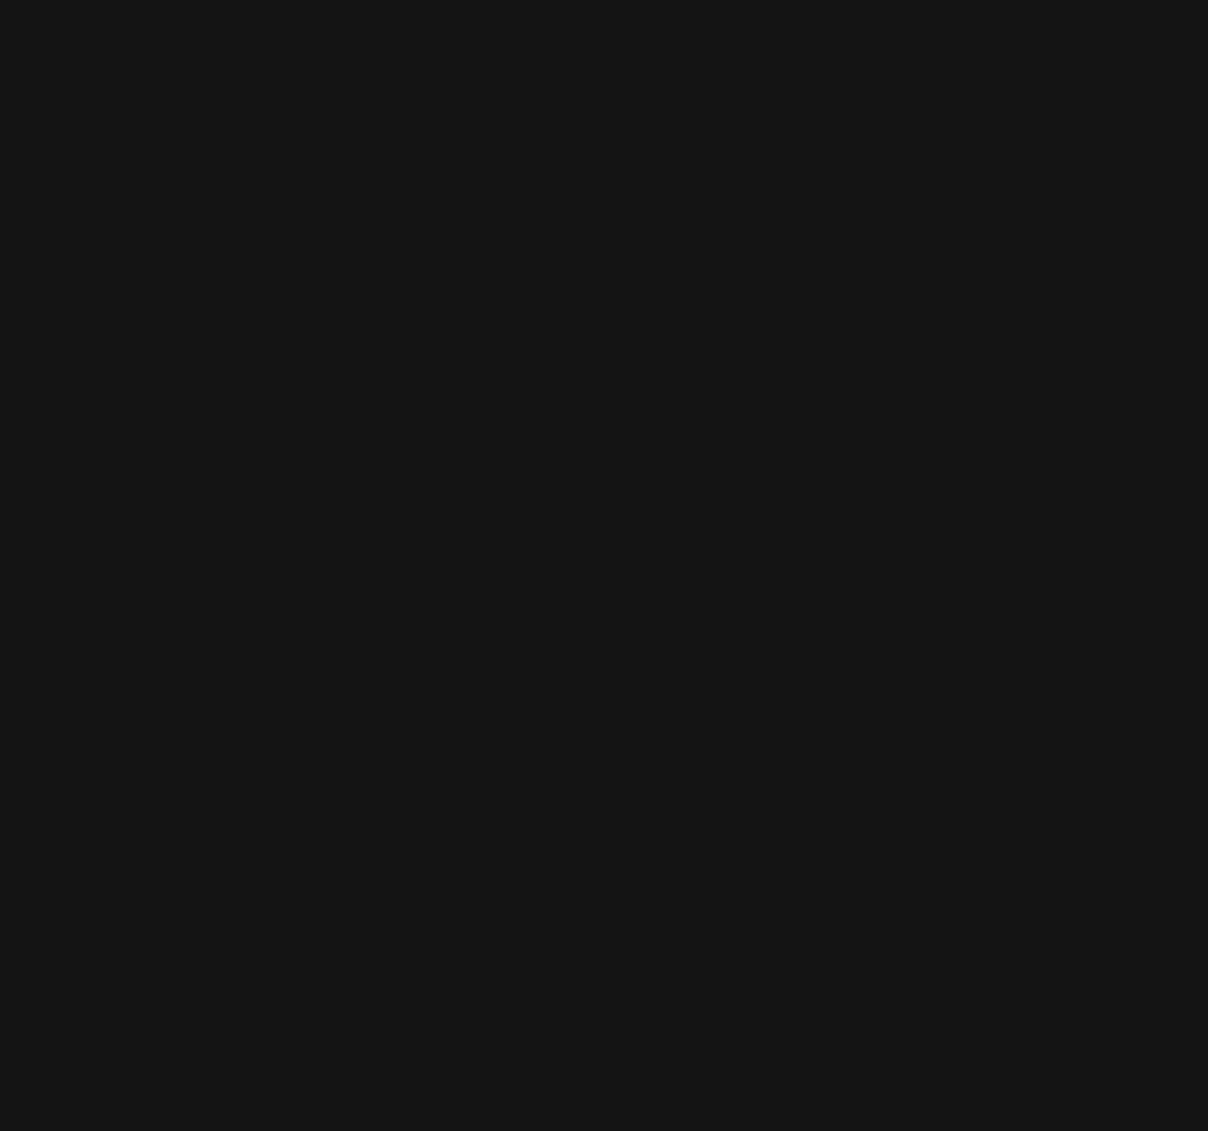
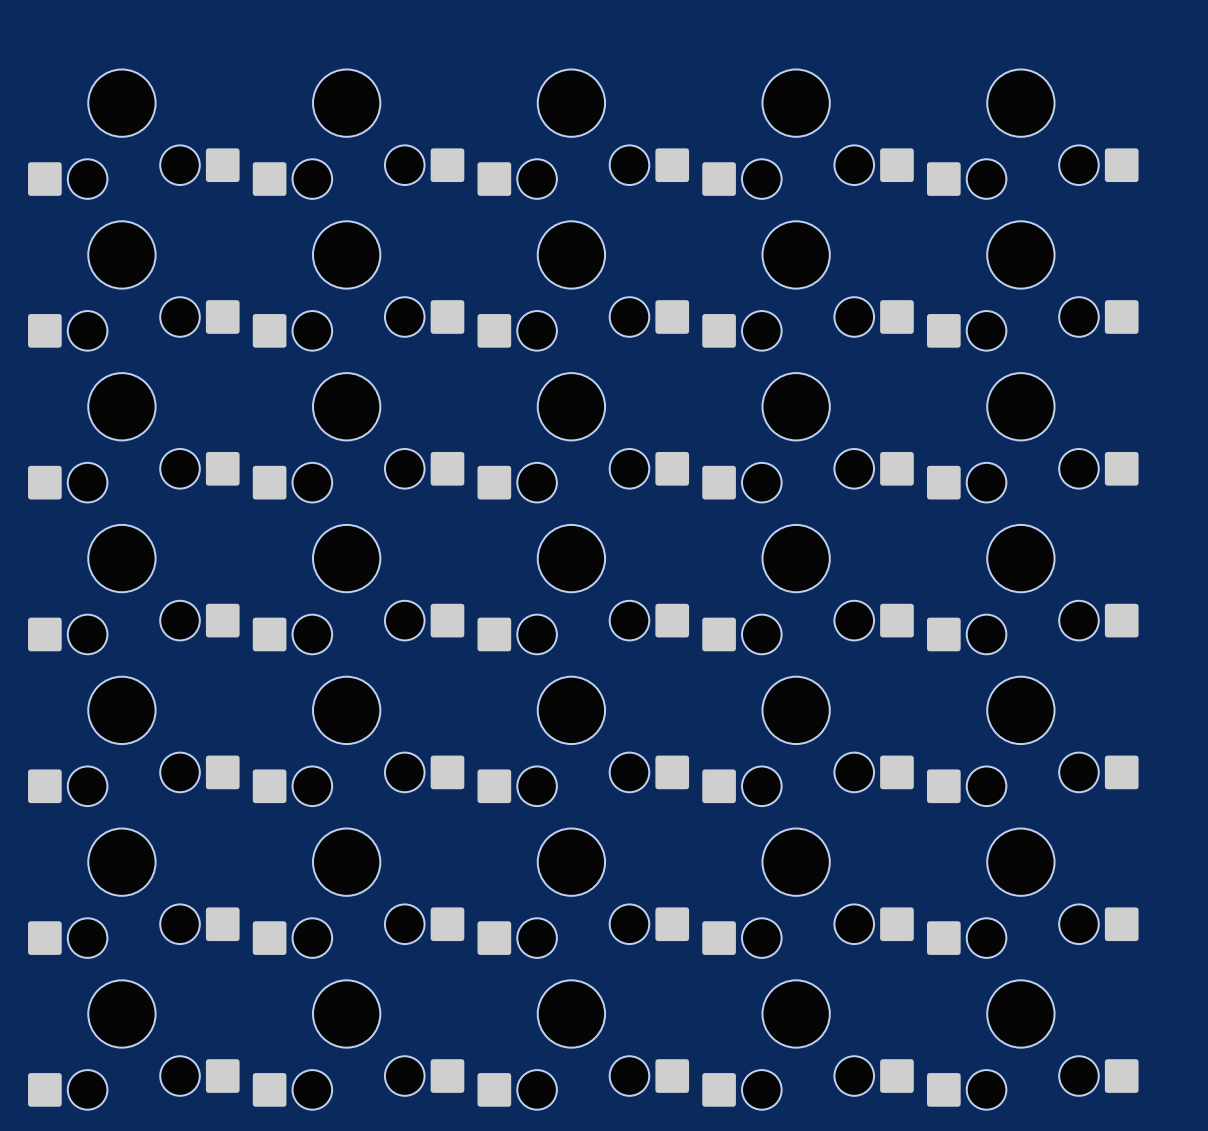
part: none -> (133, 134)
part: none -> (358, 134)
part: none -> (583, 134)
part: none -> (808, 134)
part: none -> (1032, 134)
part: none -> (133, 285)
part: none -> (358, 285)
part: none -> (583, 285)
part: none -> (808, 285)
part: none -> (1032, 285)
part: none -> (133, 437)
part: none -> (358, 437)
part: none -> (583, 437)
part: none -> (808, 437)
part: none -> (1032, 437)
part: none -> (133, 589)
part: none -> (358, 589)
part: none -> (583, 589)
part: none -> (808, 589)
part: none -> (1032, 589)
part: none -> (133, 741)
part: none -> (358, 741)
part: none -> (583, 741)
part: none -> (808, 741)
part: none -> (1032, 741)
part: none -> (133, 893)
part: none -> (358, 893)
part: none -> (583, 893)
part: none -> (808, 893)
part: none -> (1032, 893)
part: none -> (133, 1045)
part: none -> (358, 1045)
part: none -> (583, 1045)
part: none -> (808, 1045)
part: none -> (1032, 1045)

